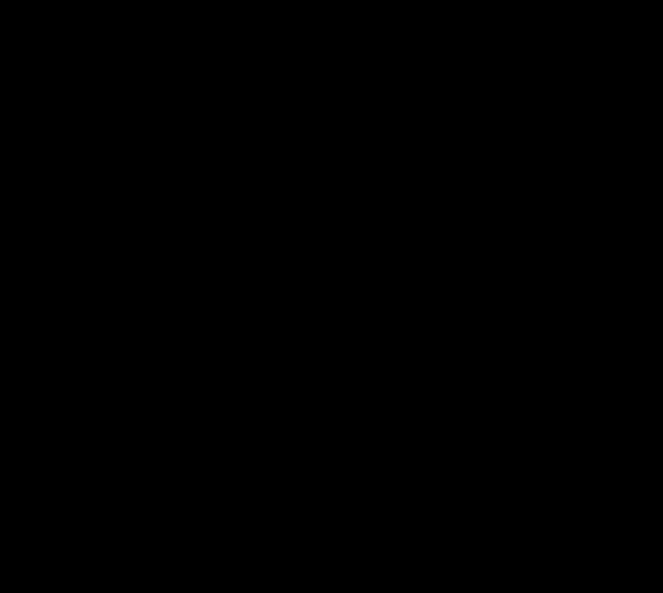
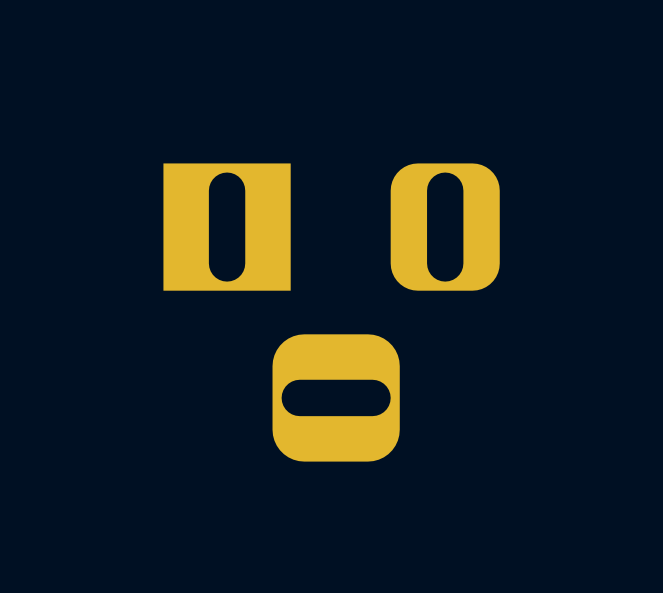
part: none -> (331, 312)

